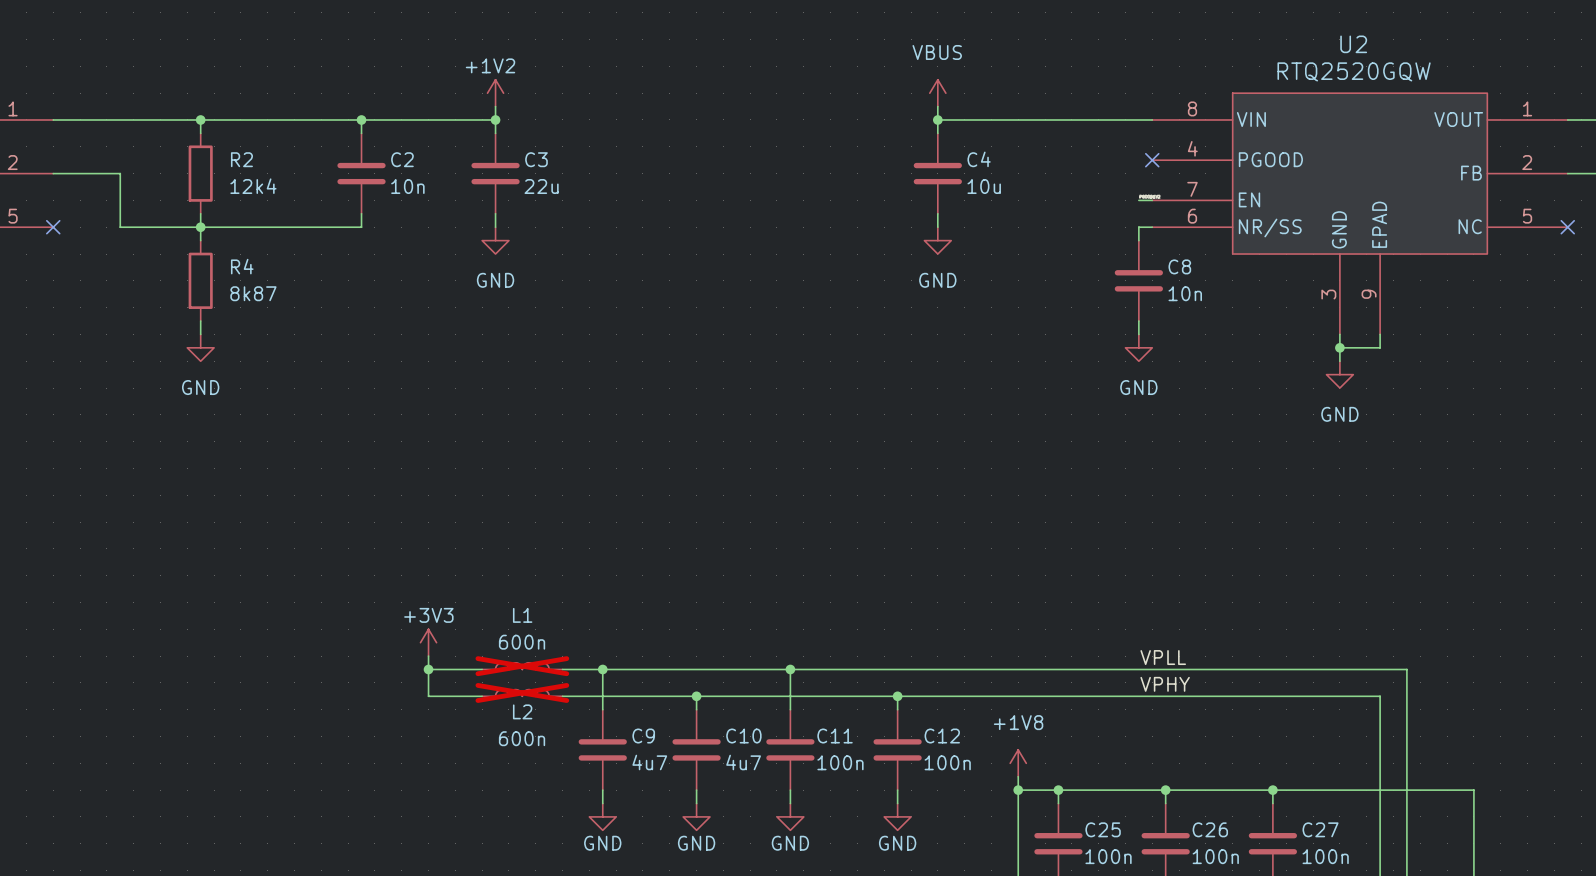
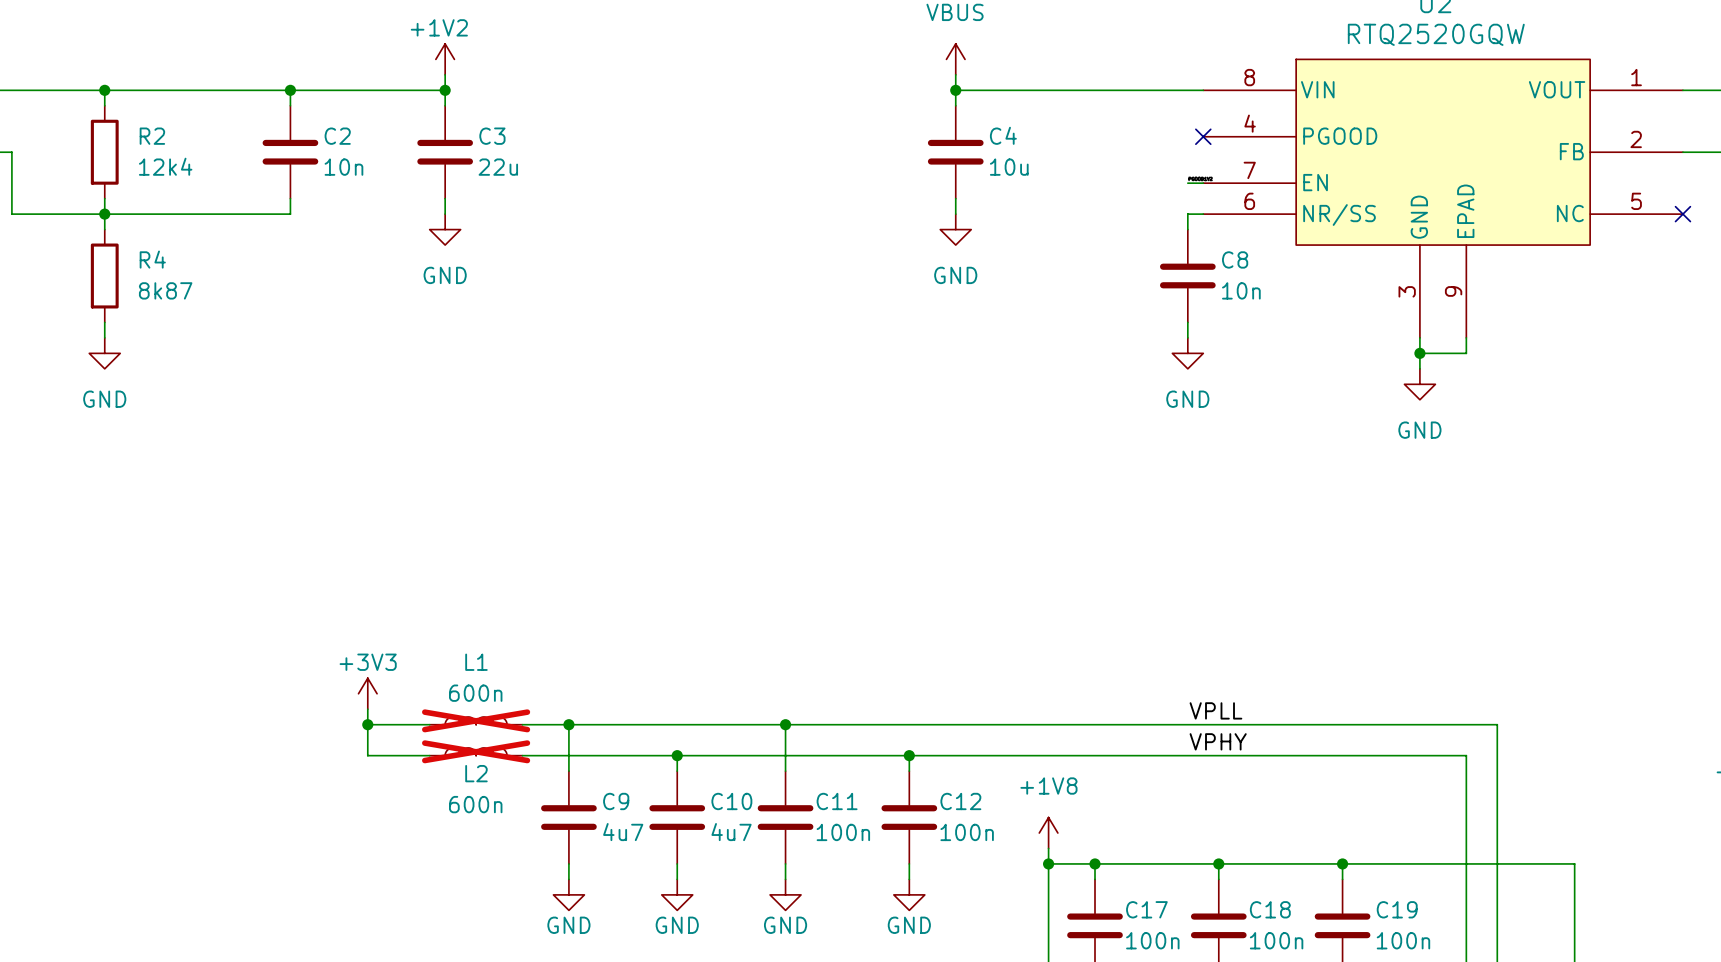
C25 name: C25 (1103, 829) -> C17 (1146, 909)
C26 name: C26 (1210, 829) -> C18 (1270, 909)
C27 name: C27 (1320, 829) -> C19 (1397, 909)

